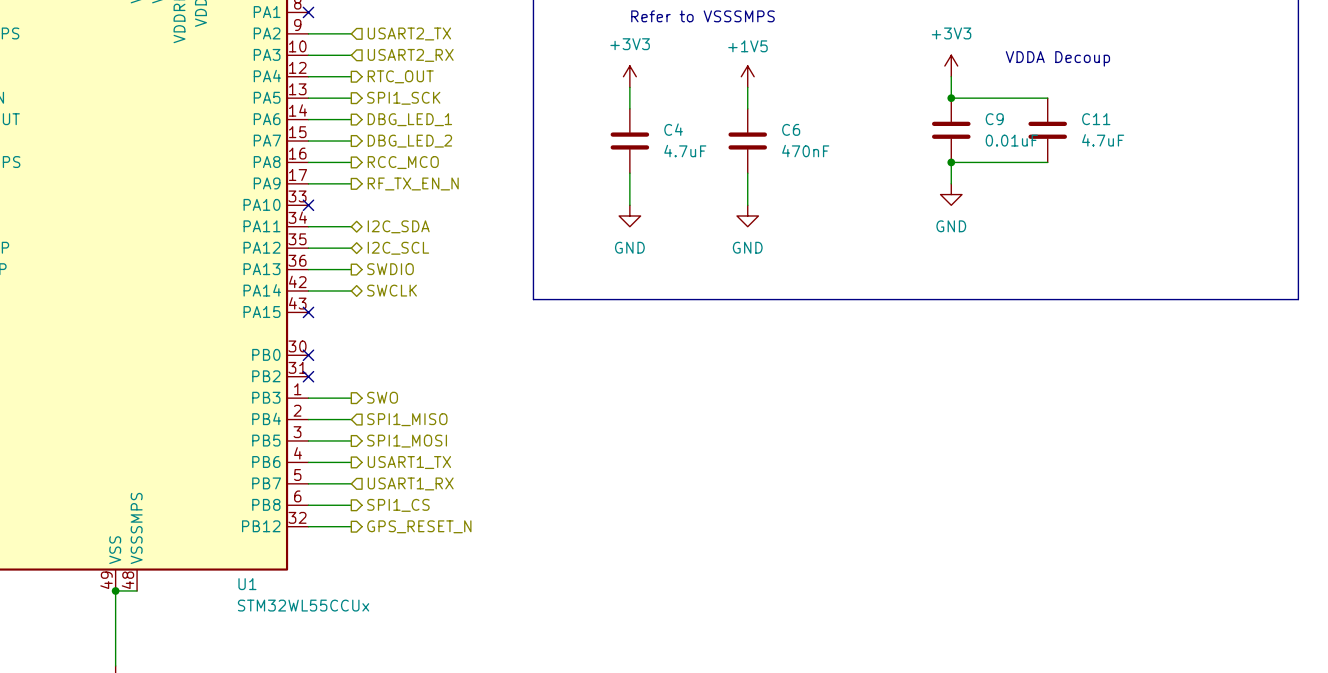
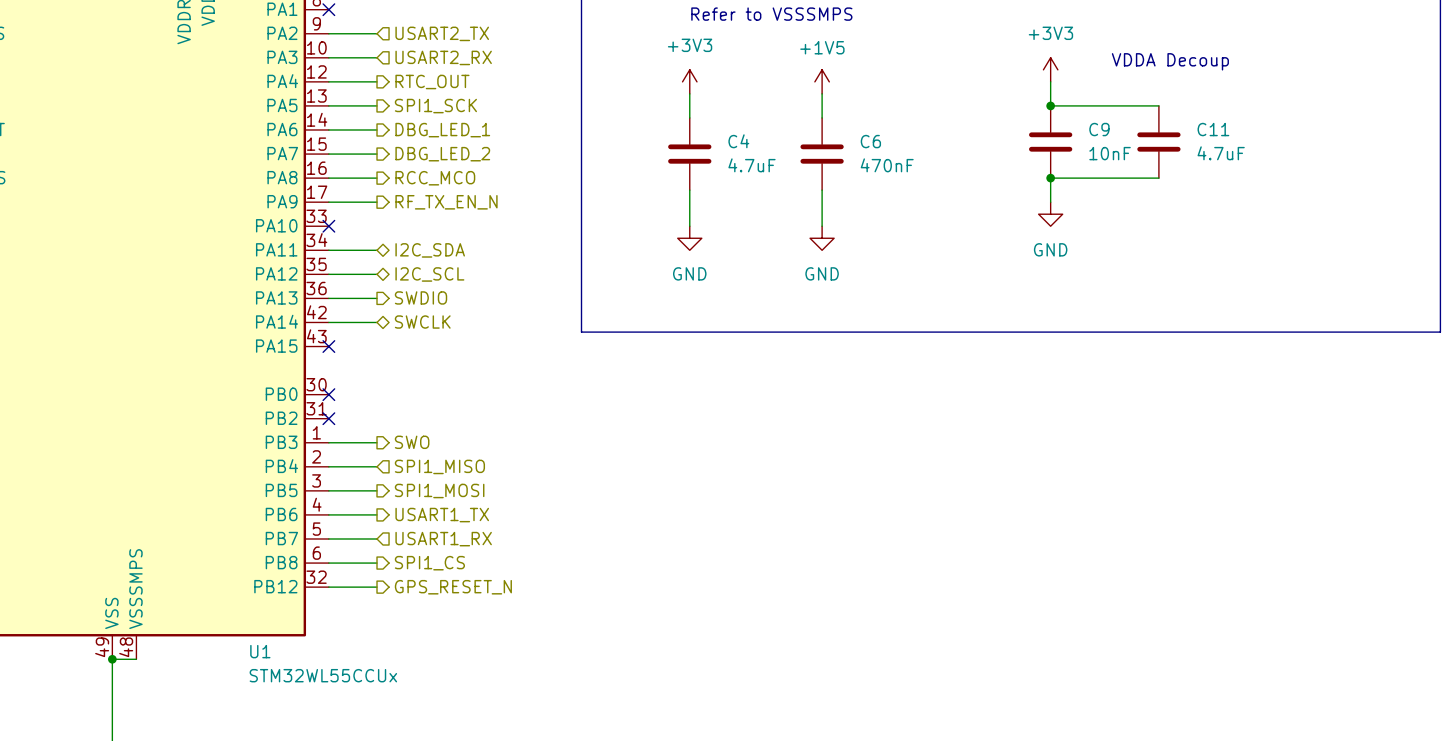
C9 value: 0.01uF (1011, 140) -> 10nF (1110, 153)

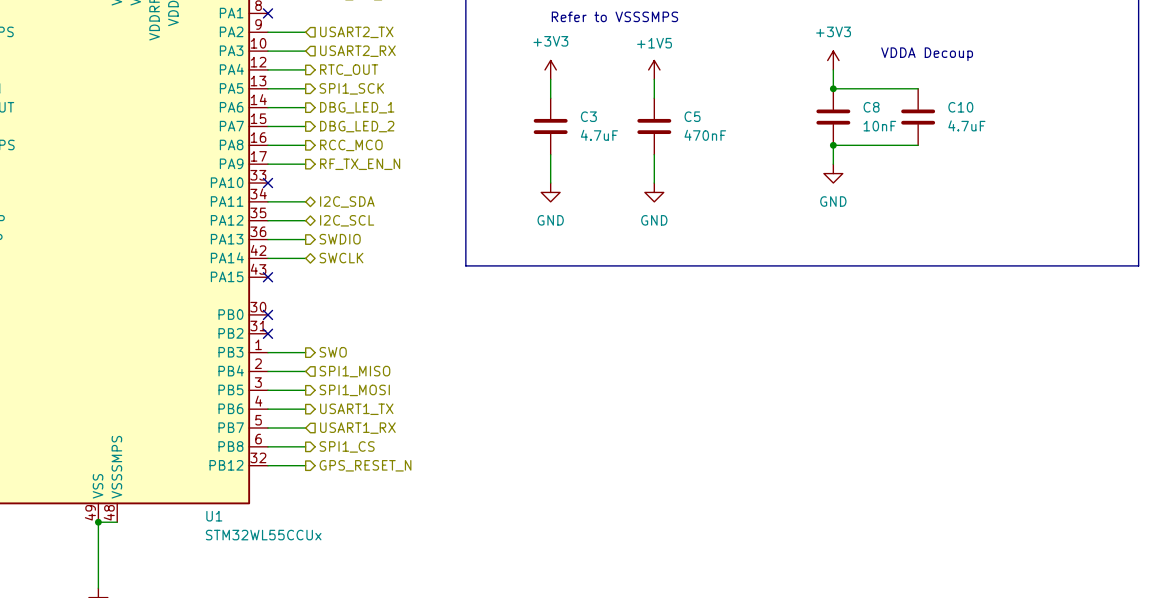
C9 name: C9 (1099, 129) -> C8 (871, 107)
C11 name: C11 (1213, 129) -> C10 (960, 107)
C4 name: C4 (738, 141) -> C3 (588, 116)
C6 name: C6 (870, 141) -> C5 (692, 116)

